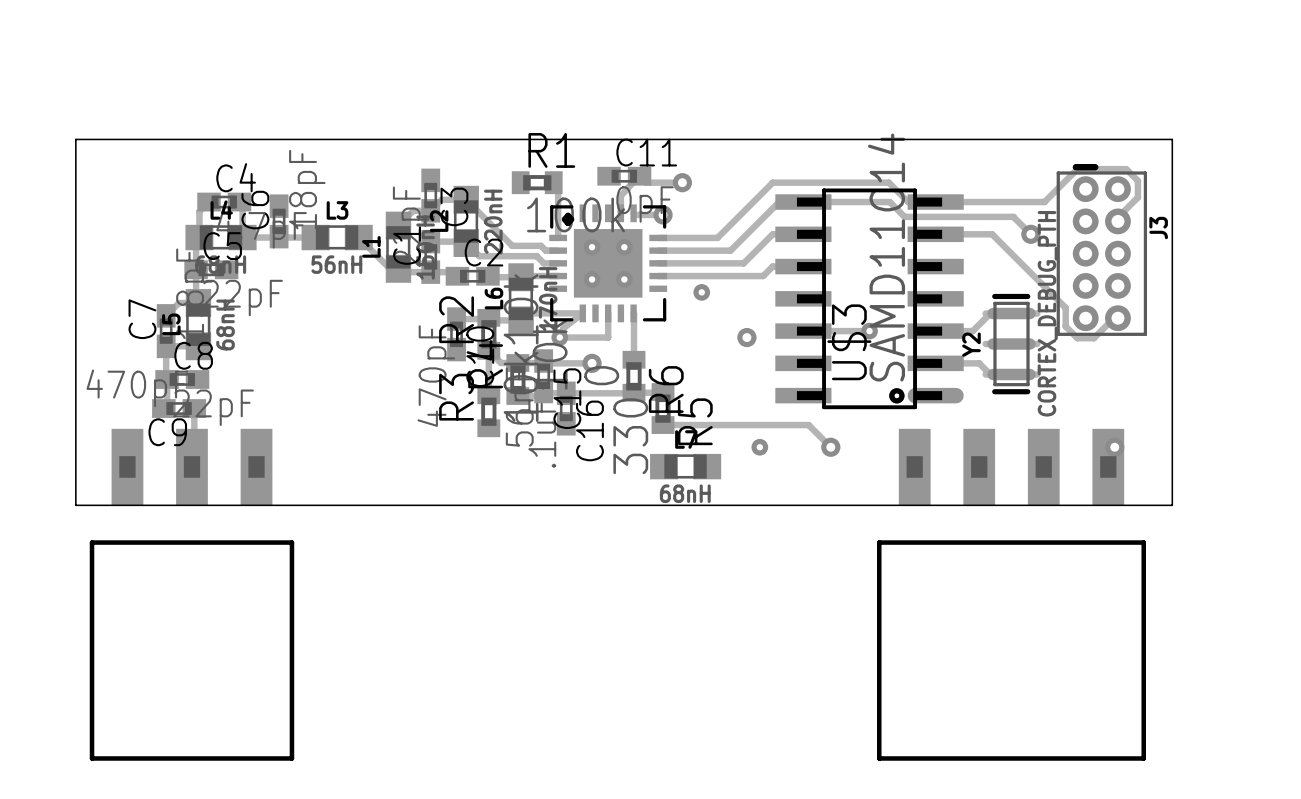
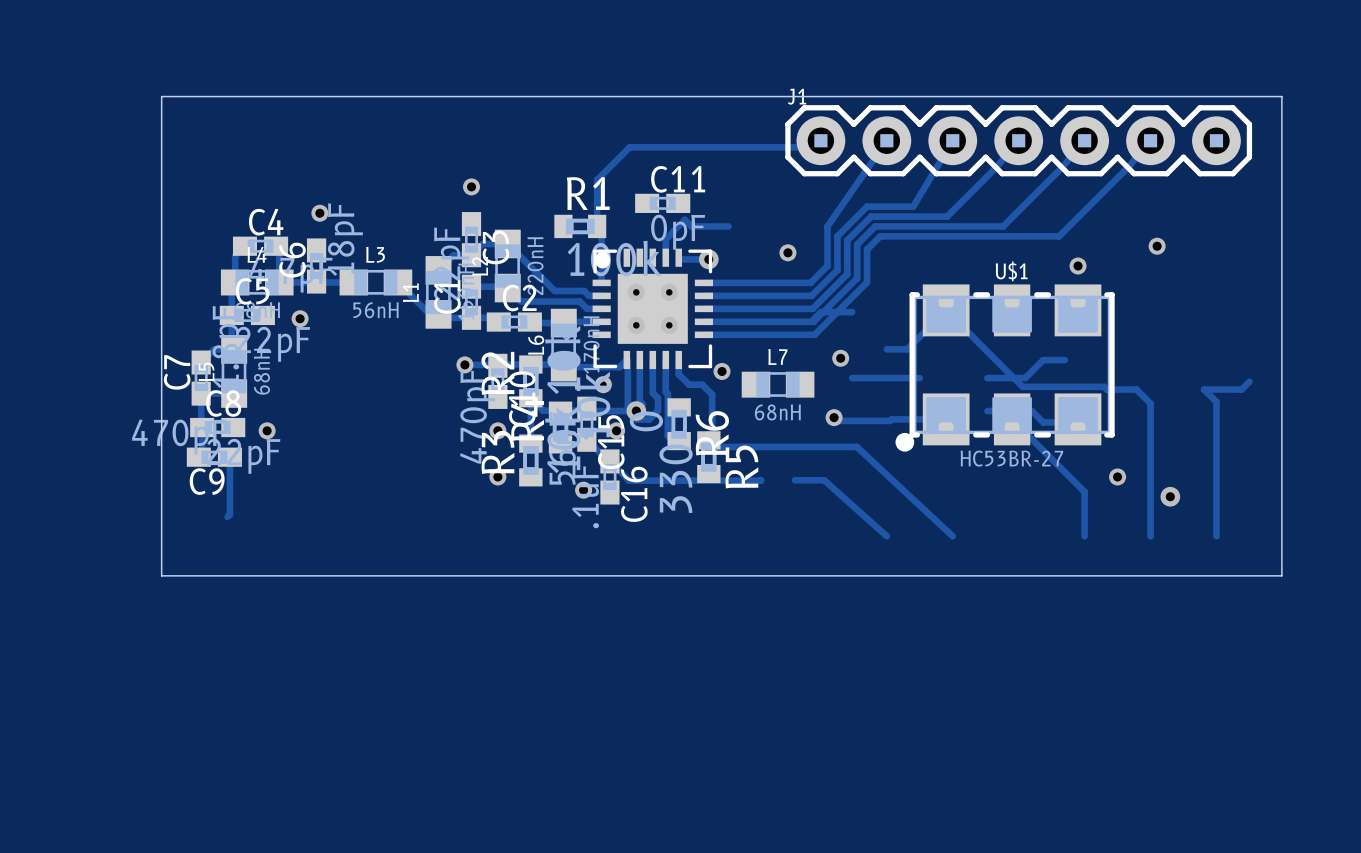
track: none -> (820, 140) (801, 147) (629, 147) (597, 179) (597, 226)
track: none -> (886, 140) (827, 226) (827, 266) (810, 282) (764, 282)
J1: none -> (1018, 140)
track: none -> (1150, 140) (1128, 167) (1059, 236) (880, 236) (867, 249) (867, 282) (814, 334) (703, 334)
board edge: (75, 139) (1172, 139) (1172, 505) (75, 505) (75, 139) -> (161, 96) (161, 575) (1281, 575) (1281, 96) (161, 96)
via: none -> (471, 186)
via: none -> (319, 213)
C11 position: (624, 176) -> (662, 203)
via: (682, 182) -> none
track: (825, 182) (772, 182) (717, 237) -> (875, 226) (857, 244) (857, 278) (813, 321) (811, 321)
track: (888, 182) (908, 202) (1044, 202) (1077, 169) (1126, 169) (1137, 180) (1137, 197) (1117, 217) (1117, 221) -> (939, 226) (1003, 226) (1062, 167) (1084, 140)
via: none -> (1157, 246)
via: none -> (787, 252)
track: (803, 234) (772, 234) (743, 263) -> (1018, 140) (996, 167) (947, 216) (871, 216) (847, 240) (847, 274) (812, 308) (791, 308)
track: (935, 234) (992, 234) (1065, 307) (1065, 326) (1077, 338) (1093, 338) (1113, 318) (1117, 318) -> none
track: (1030, 234) (1013, 216) (904, 216) (889, 202) (779, 202) (730, 250) -> (952, 140) (913, 206) (867, 206) (837, 236) (837, 270) (811, 295) (777, 295)
via position: (1030, 234) -> (1078, 266)
J3: CORTEX_DEBUG_PTH (1101, 249) -> none
via: none -> (300, 318)
via: (701, 292) -> none
U$3: SAMD11C14 (869, 298) -> none
track: none -> (886, 349) (907, 349) (946, 310) (1022, 386) (1104, 386) (1106, 389) (1136, 389) (1150, 403) (1150, 536)
via: none -> (840, 358)
track: none -> (639, 359) (639, 401) (642, 404)
track: none -> (665, 359) (667, 436) (675, 444)
track: (633, 313) (634, 359) -> (678, 359) (678, 374) (689, 384) (702, 384) (712, 394) (712, 446) (856, 446) (952, 536)
via: none -> (464, 364)
track: (456, 319) (488, 317) (491, 320) (521, 320) (528, 313) (582, 313) (563, 328) (559, 337) (608, 337) -> (464, 364) (561, 364) (563, 367) (619, 367) (626, 359) (627, 410) (636, 419) (649, 419) (658, 410) (658, 398) (652, 393) (652, 384)
U$1: none -> HC53BR-27 (1005, 368)
via: none -> (722, 371)
via: (869, 331) -> none
track: none -> (1249, 381) (1241, 389) (1204, 389) (1216, 401) (1216, 536)
via: (746, 337) -> none
Y2: (1011, 344) -> none
track: none -> (834, 417) (837, 420) (946, 419)
via: none -> (834, 417)
track: none -> (1012, 419) (1084, 491) (1084, 536)
via: none -> (267, 430)
via: none -> (497, 430)
via: none -> (616, 430)
track: (663, 392) (545, 393) -> (761, 480) (629, 480) (588, 441)
C16 position: (566, 408) -> (609, 476)
track: (663, 425) (808, 425) (830, 447) -> none
via: none -> (497, 476)
via: none -> (1117, 476)
track: none -> (794, 480) (824, 480) (886, 536)
via: none -> (583, 490)
via: (759, 447) -> none
via: (830, 447) -> none
L7 position: (685, 466) -> (778, 384)
part: (191, 594) -> none
part: (1011, 594) -> none

